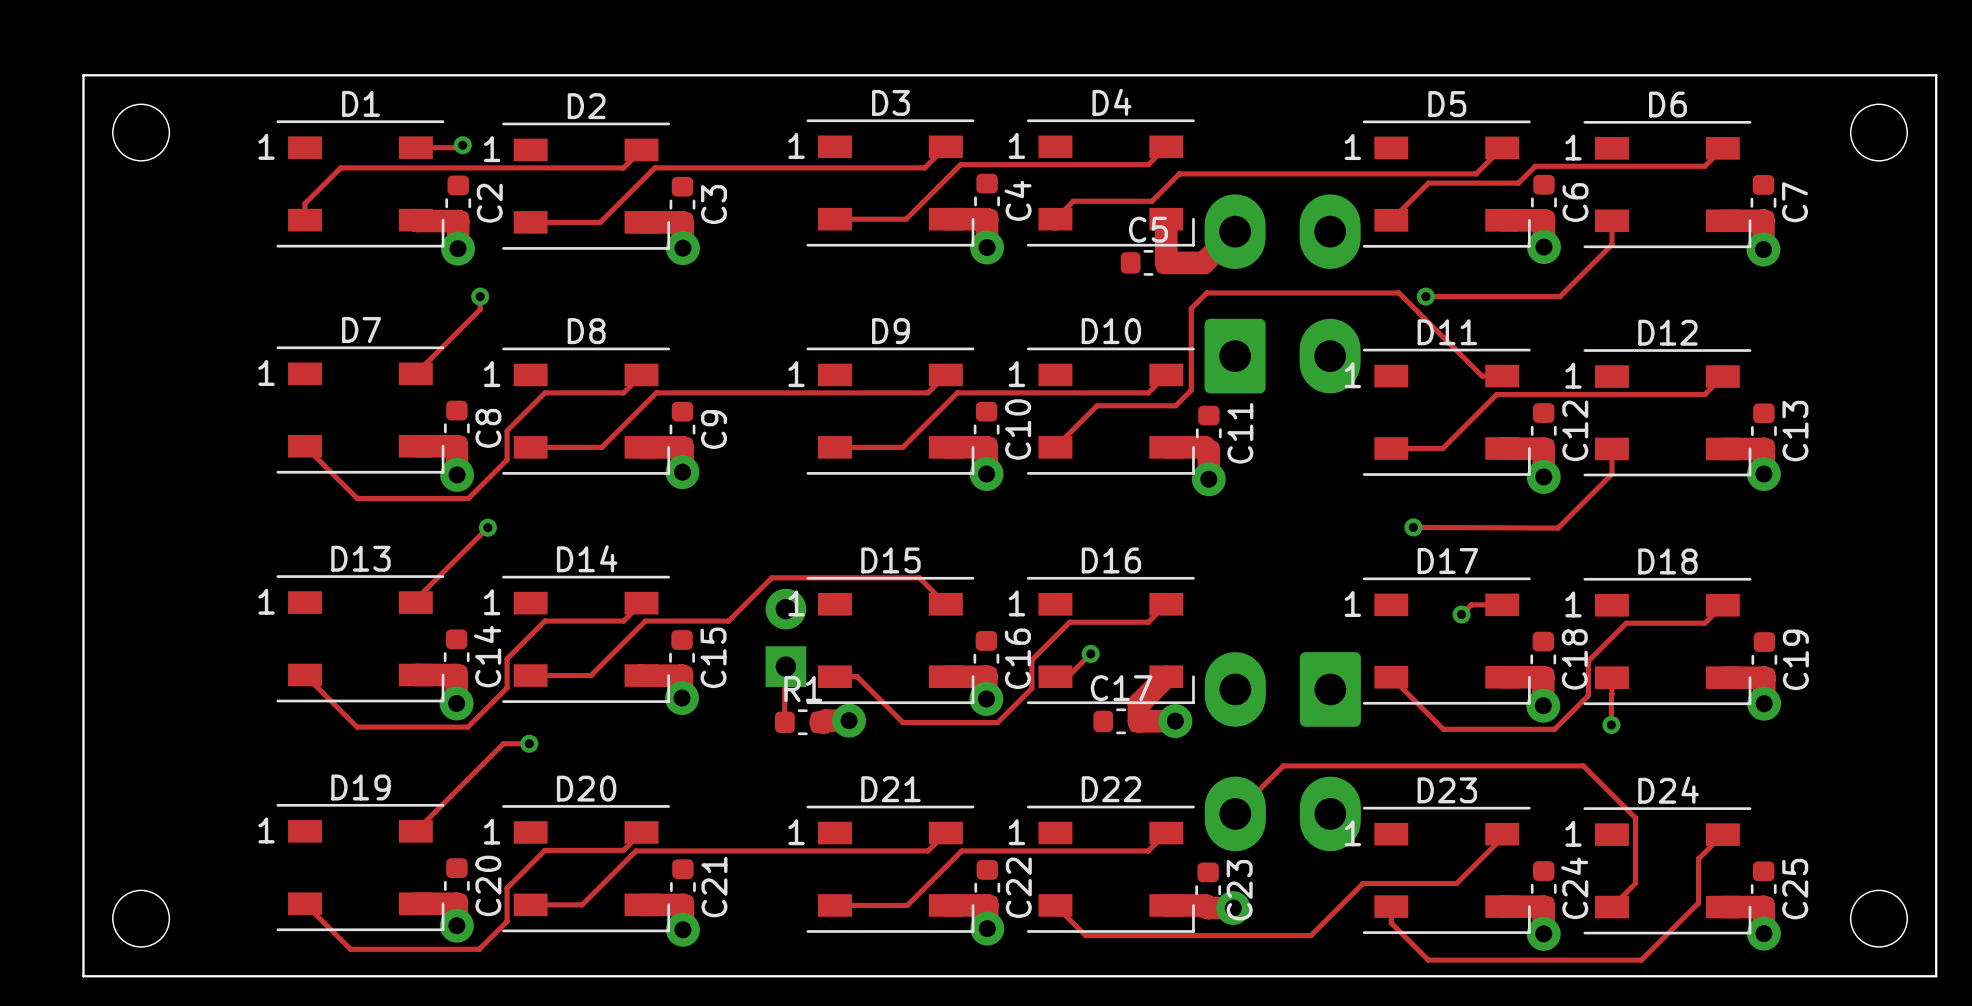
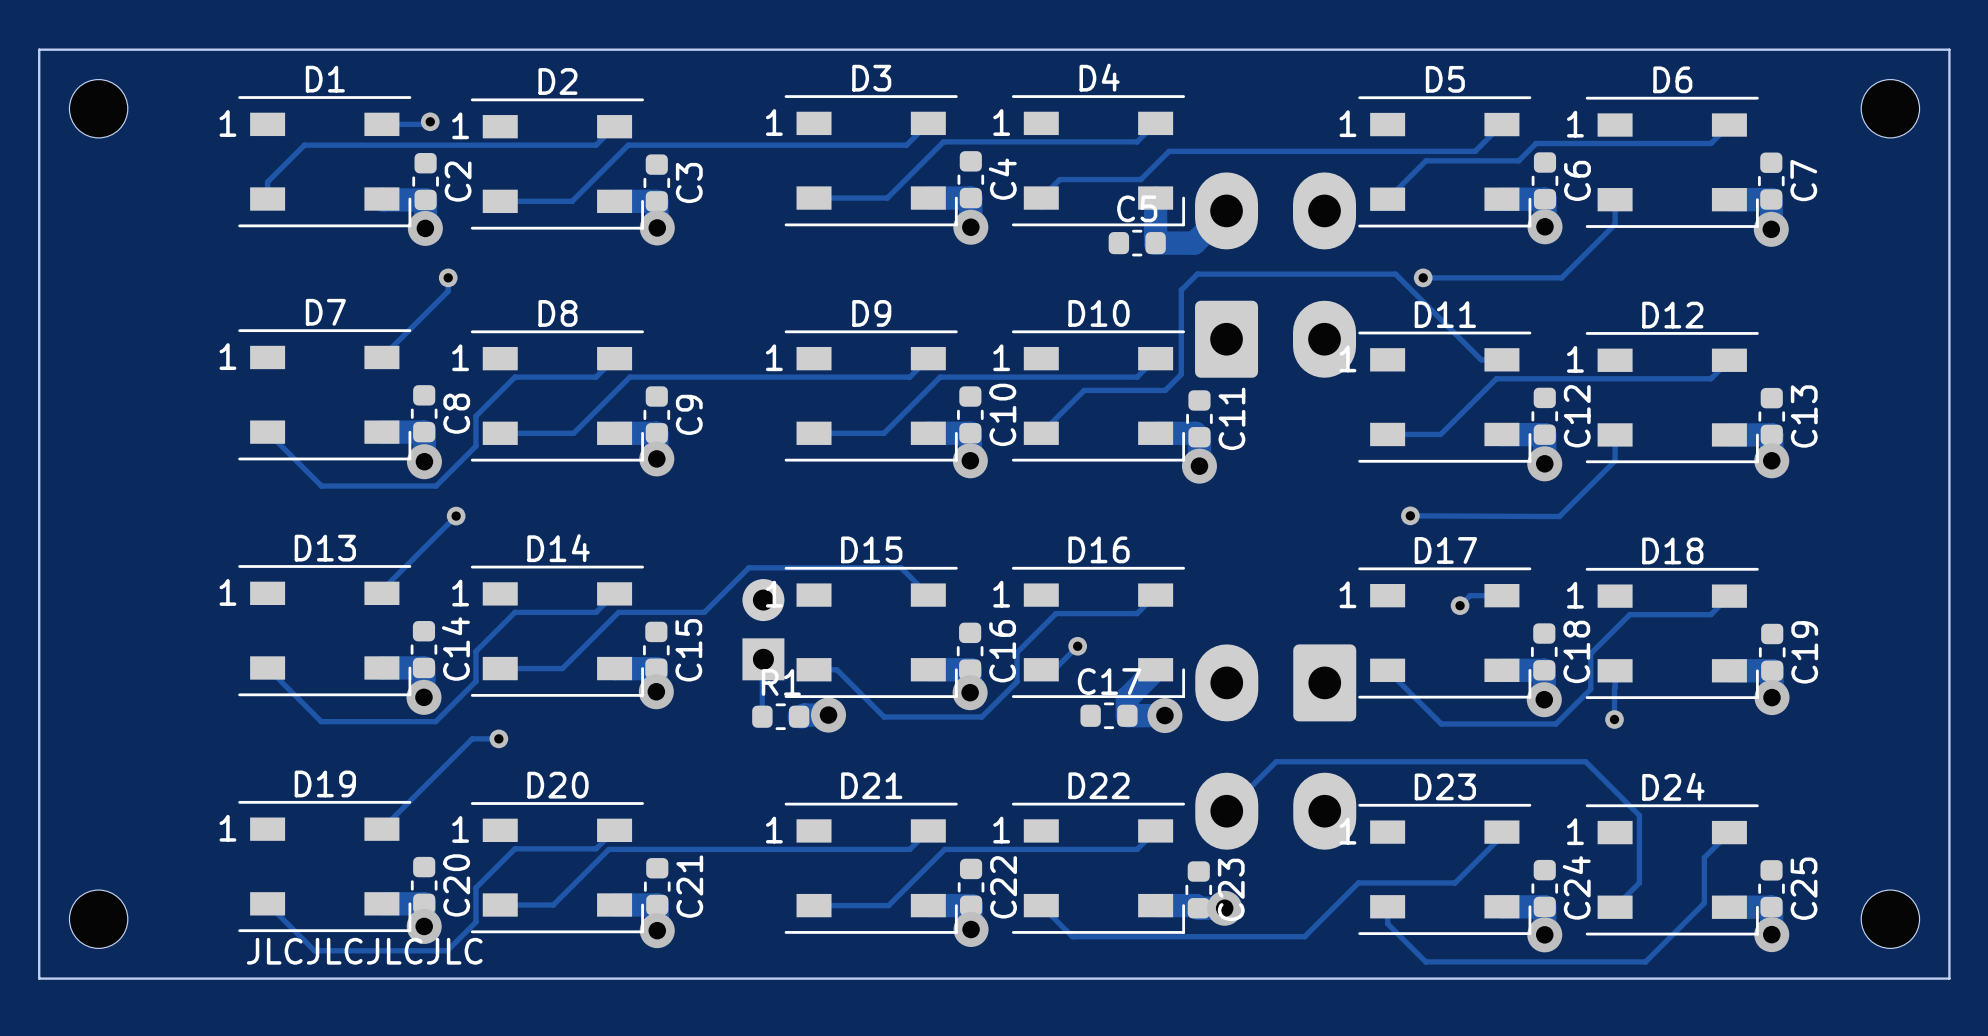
text: none -> JLCJLCJLCJLC (364, 951)

